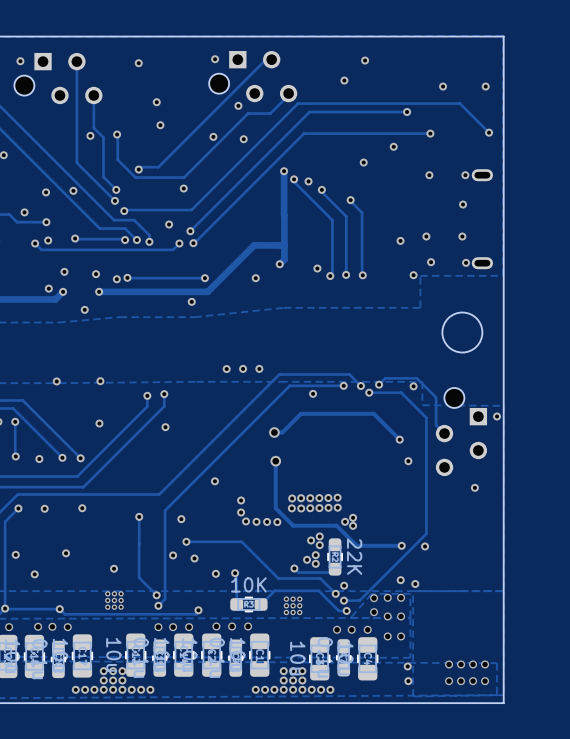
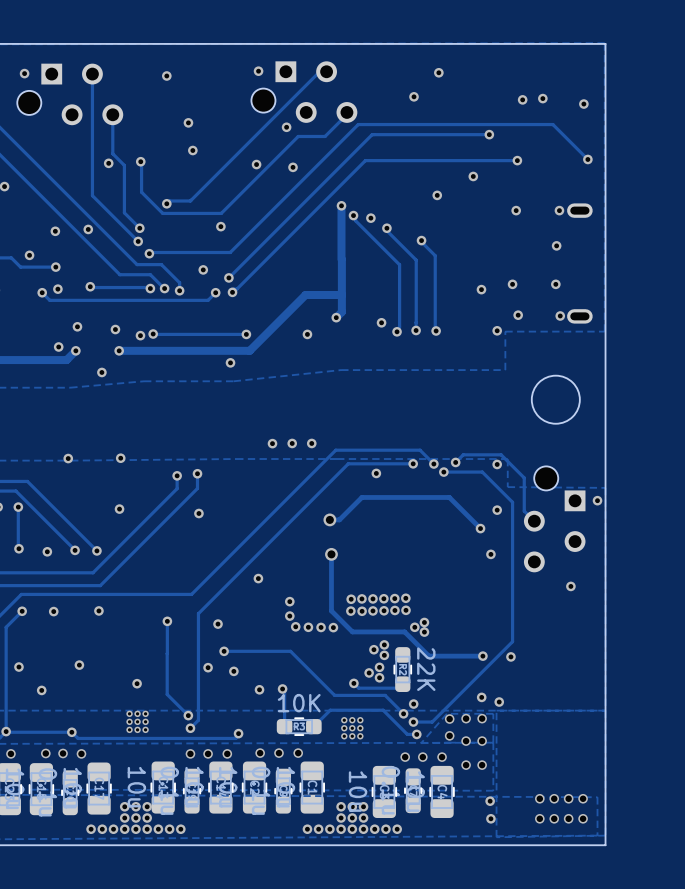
via: none -> (542, 98)
via: none -> (522, 99)
via: (443, 86) -> none
via: none -> (497, 510)

